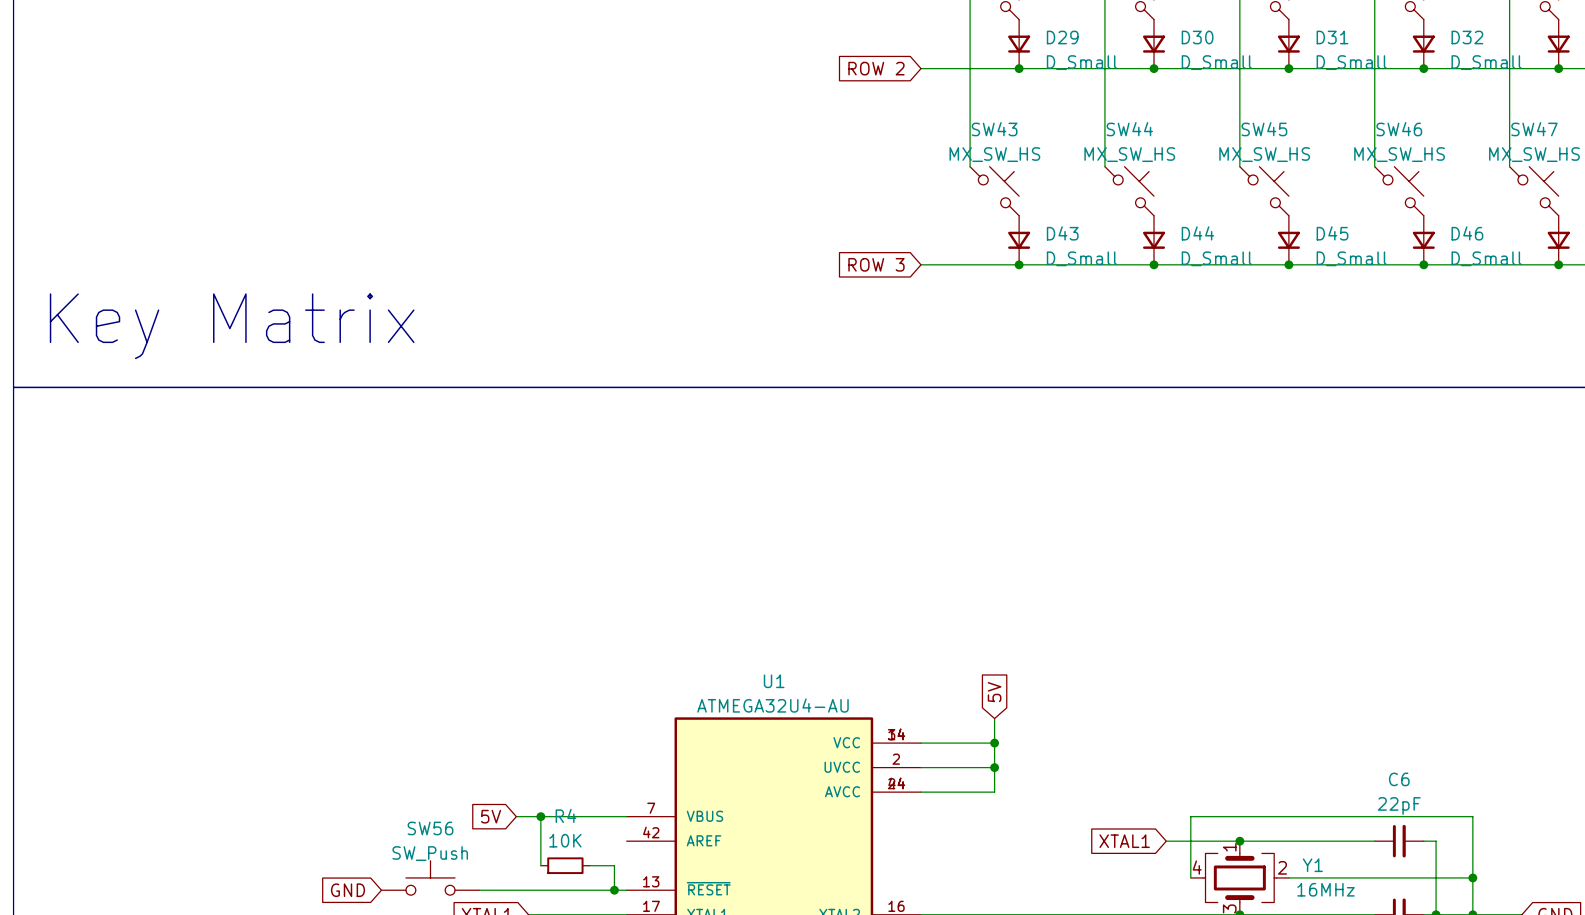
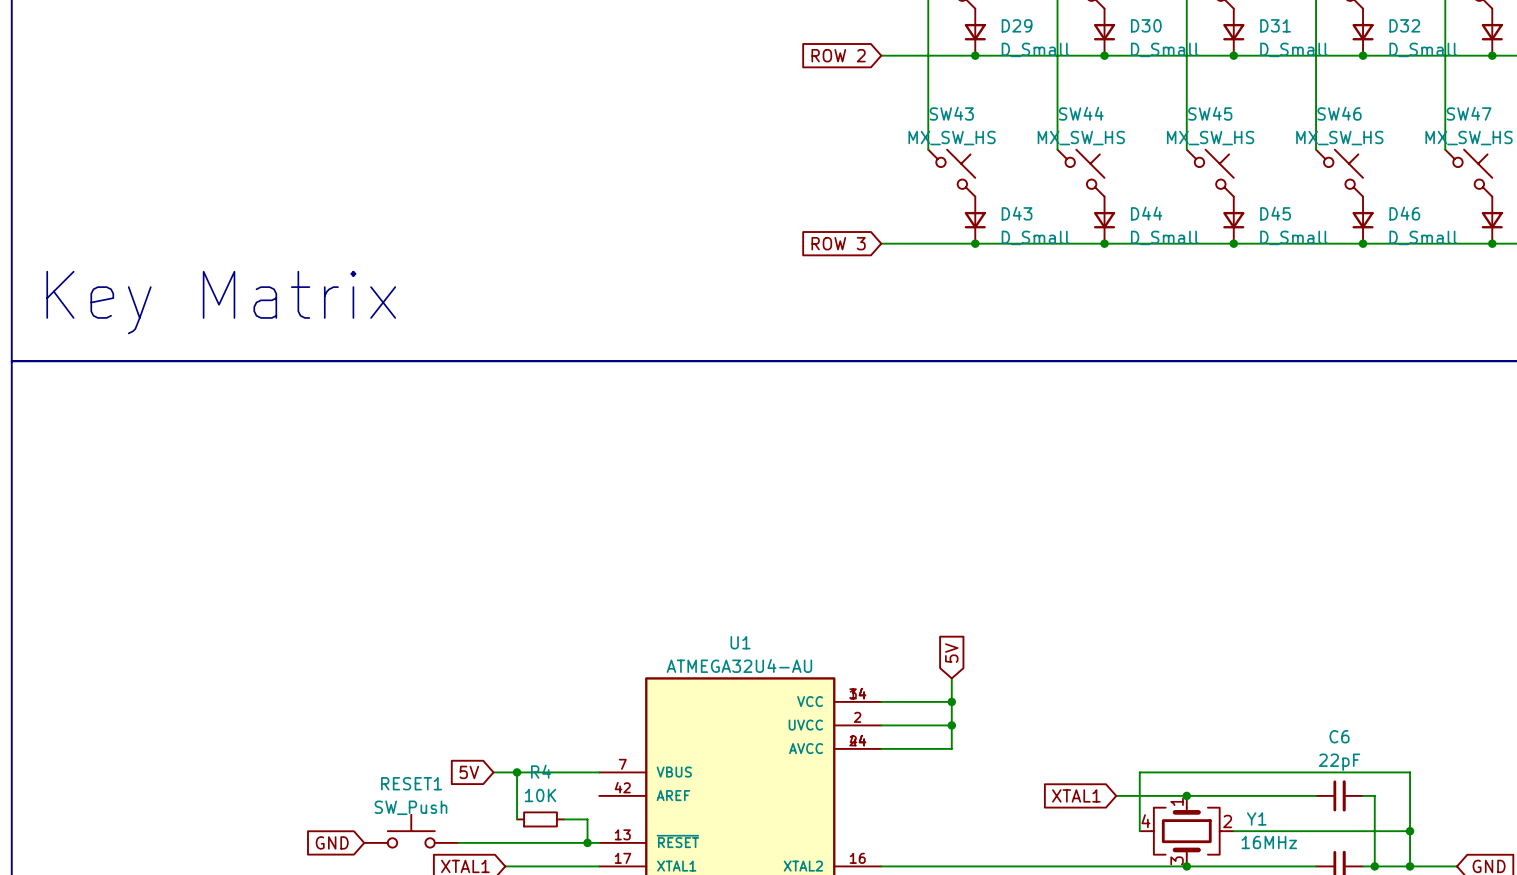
SW56 name: SW56 (430, 828) -> RESET1 (411, 783)

